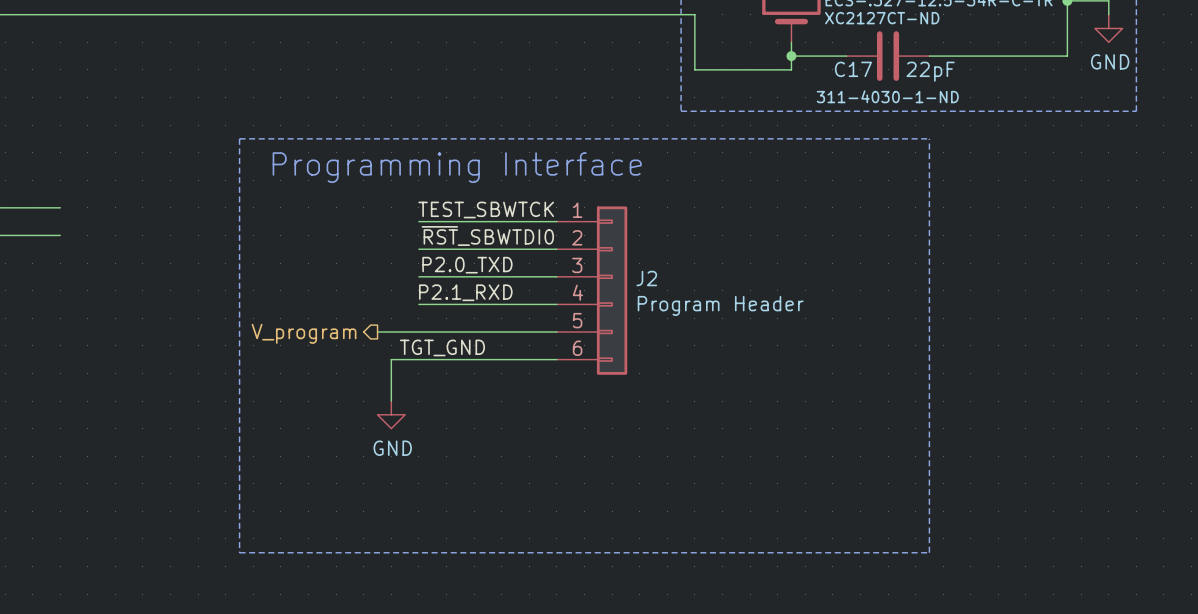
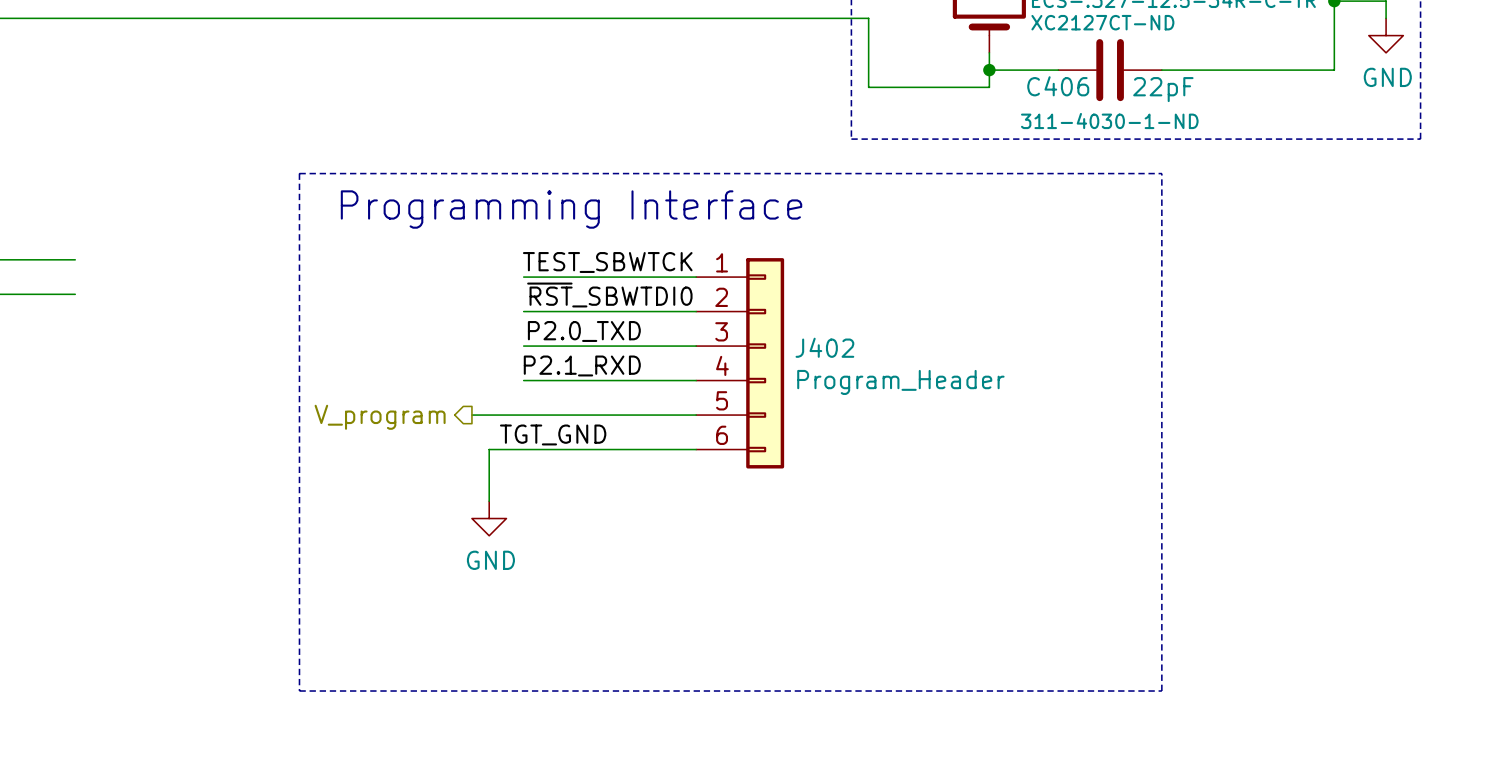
C17 name: C17 (853, 69) -> C406 (1058, 86)
J2 name: J2 (646, 278) -> J402 (824, 347)
J2 value: Program Header (720, 305) -> Program_Header (900, 382)

